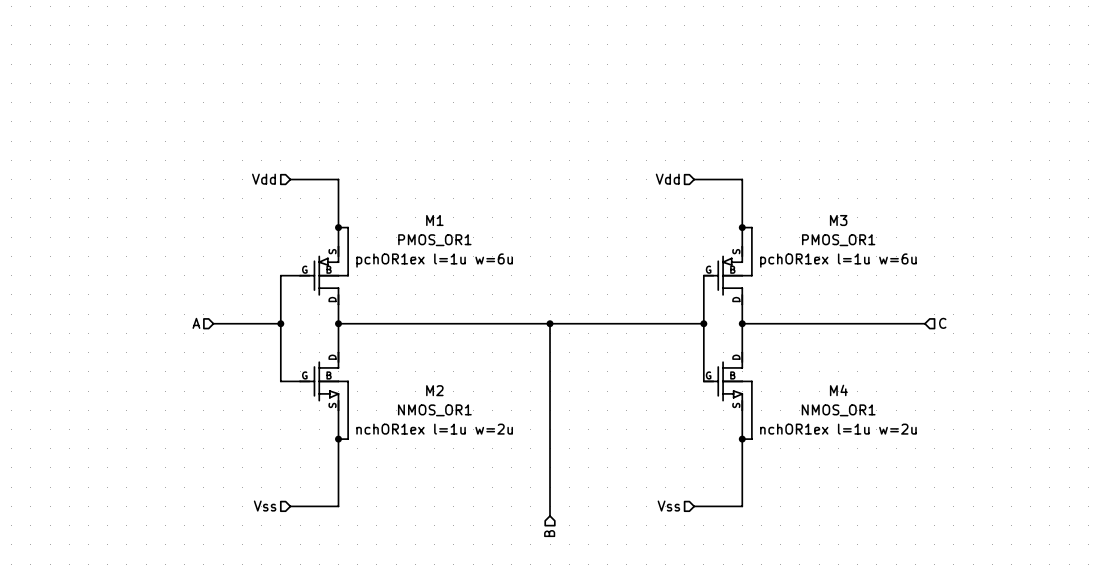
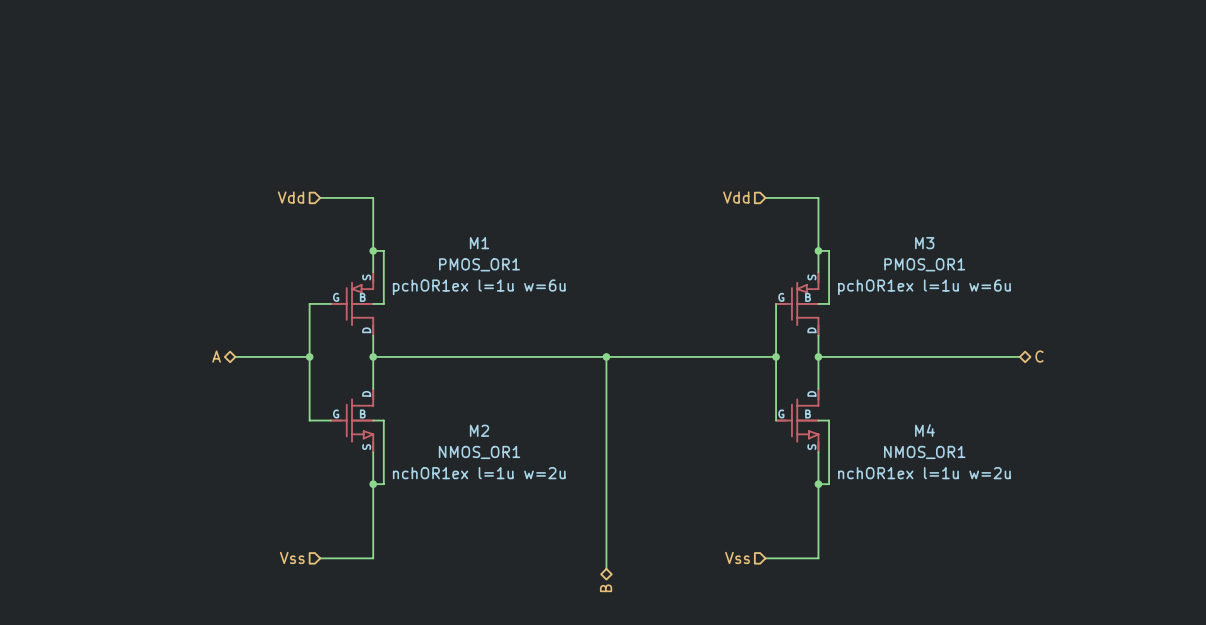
hierarchical label shape: input (196, 323) -> bidirectional (216, 356)
hierarchical label shape: input (942, 323) -> bidirectional (1039, 356)
hierarchical label shape: input (549, 533) -> bidirectional (606, 588)

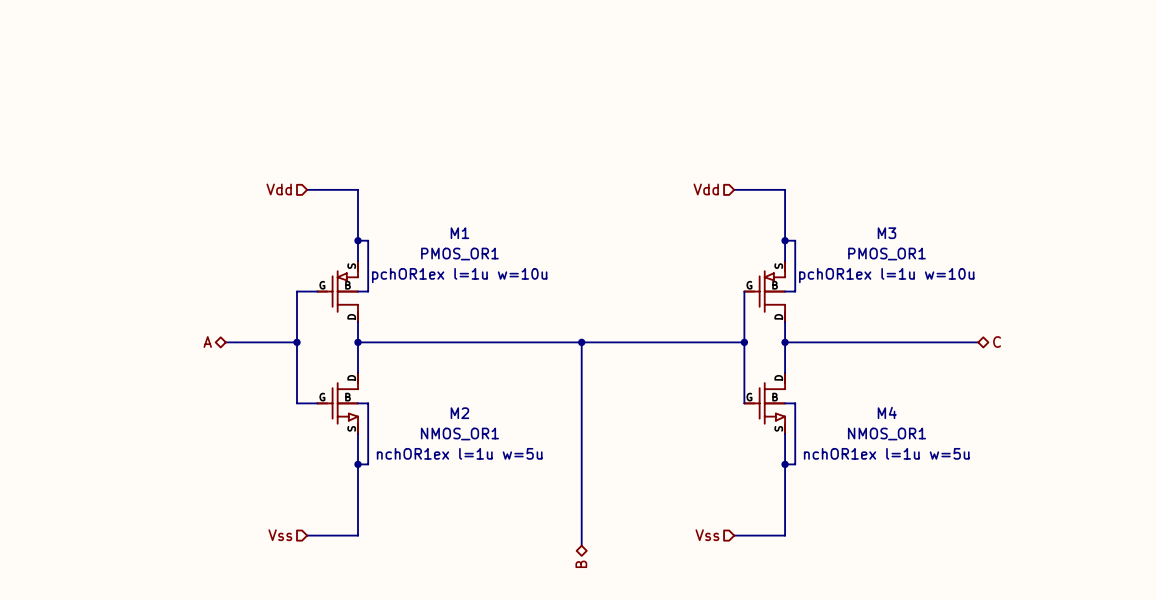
M1 text: pchOR1ex l=1u w=6u (479, 287) -> pchOR1ex l=1u w=10u (459, 275)
M3 text: pchOR1ex l=1u w=6u (924, 287) -> pchOR1ex l=1u w=10u (886, 275)
M2 text: nchOR1ex l=1u w=2u (479, 473) -> nchOR1ex l=1u w=5u (459, 453)
M4 text: nchOR1ex l=1u w=2u (924, 473) -> nchOR1ex l=1u w=5u (886, 453)

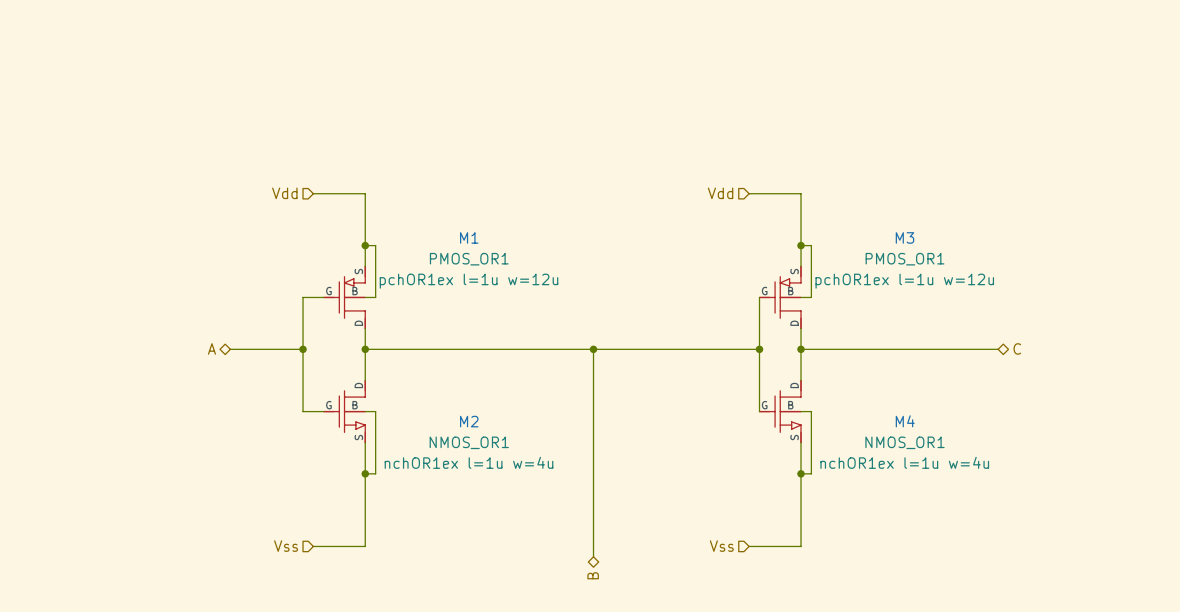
M1 text: pchOR1ex l=1u w=10u (459, 275) -> pchOR1ex l=1u w=12u (469, 281)
M3 text: pchOR1ex l=1u w=10u (886, 275) -> pchOR1ex l=1u w=12u (904, 281)
M2 text: nchOR1ex l=1u w=5u (459, 453) -> nchOR1ex l=1u w=4u (469, 462)
M4 text: nchOR1ex l=1u w=5u (886, 453) -> nchOR1ex l=1u w=4u (904, 462)

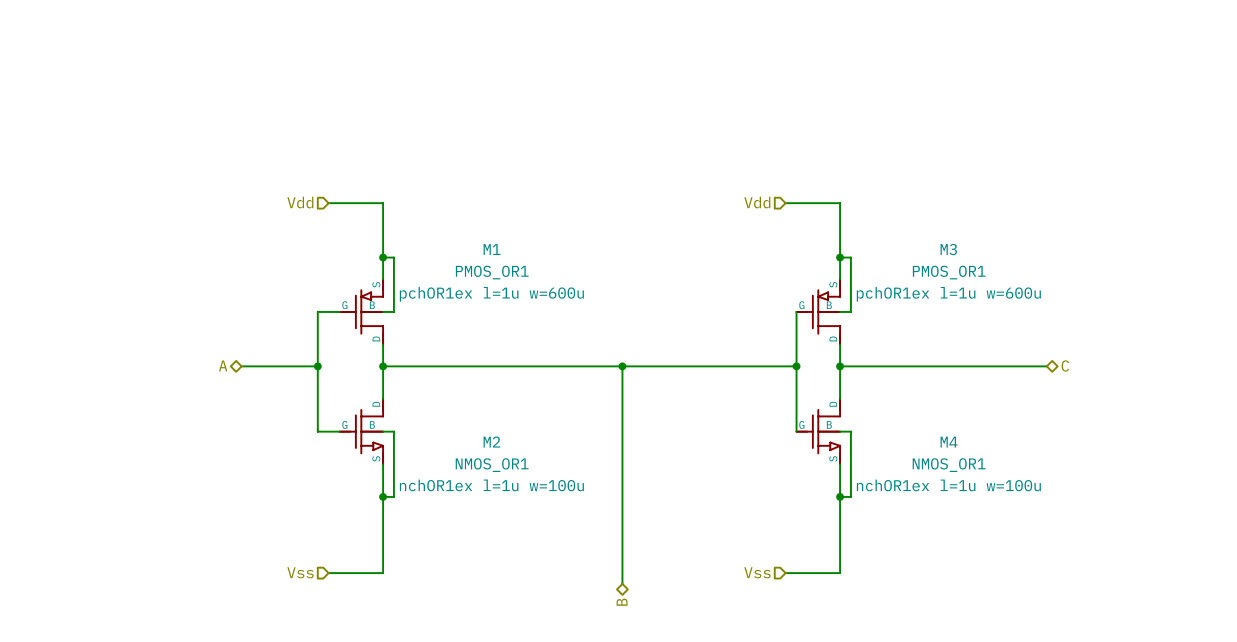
M1 text: pchOR1ex l=1u w=12u (469, 281) -> pchOR1ex l=1u w=600u (491, 294)
M3 text: pchOR1ex l=1u w=12u (904, 281) -> pchOR1ex l=1u w=600u (948, 294)
M2 text: nchOR1ex l=1u w=4u (469, 462) -> nchOR1ex l=1u w=100u (491, 485)
M4 text: nchOR1ex l=1u w=4u (904, 462) -> nchOR1ex l=1u w=100u (948, 485)

